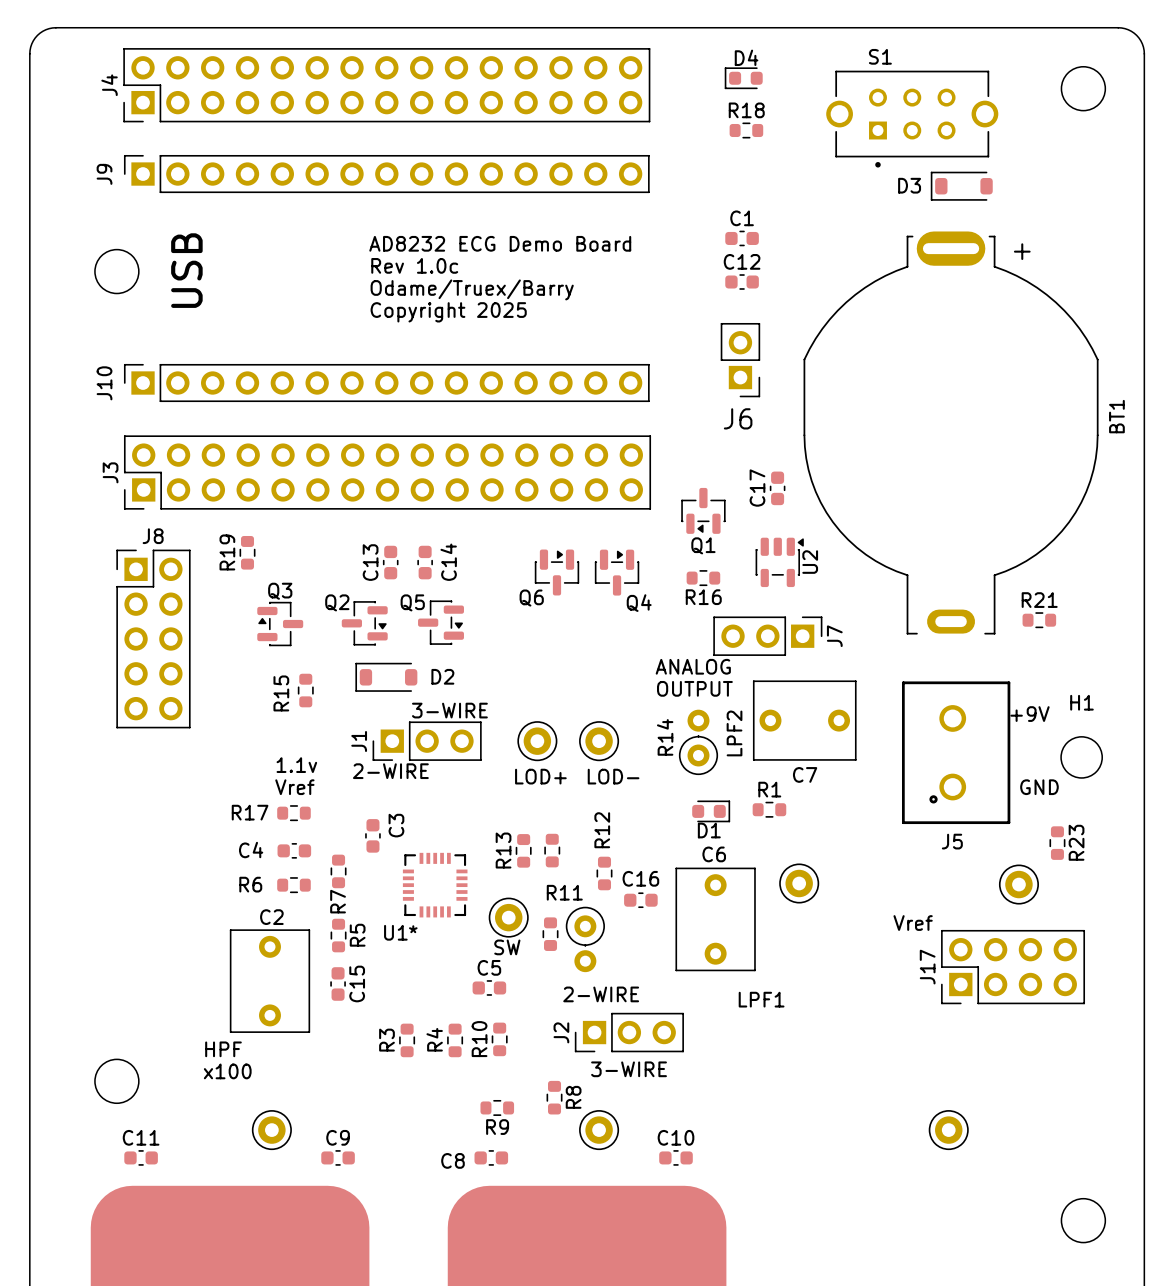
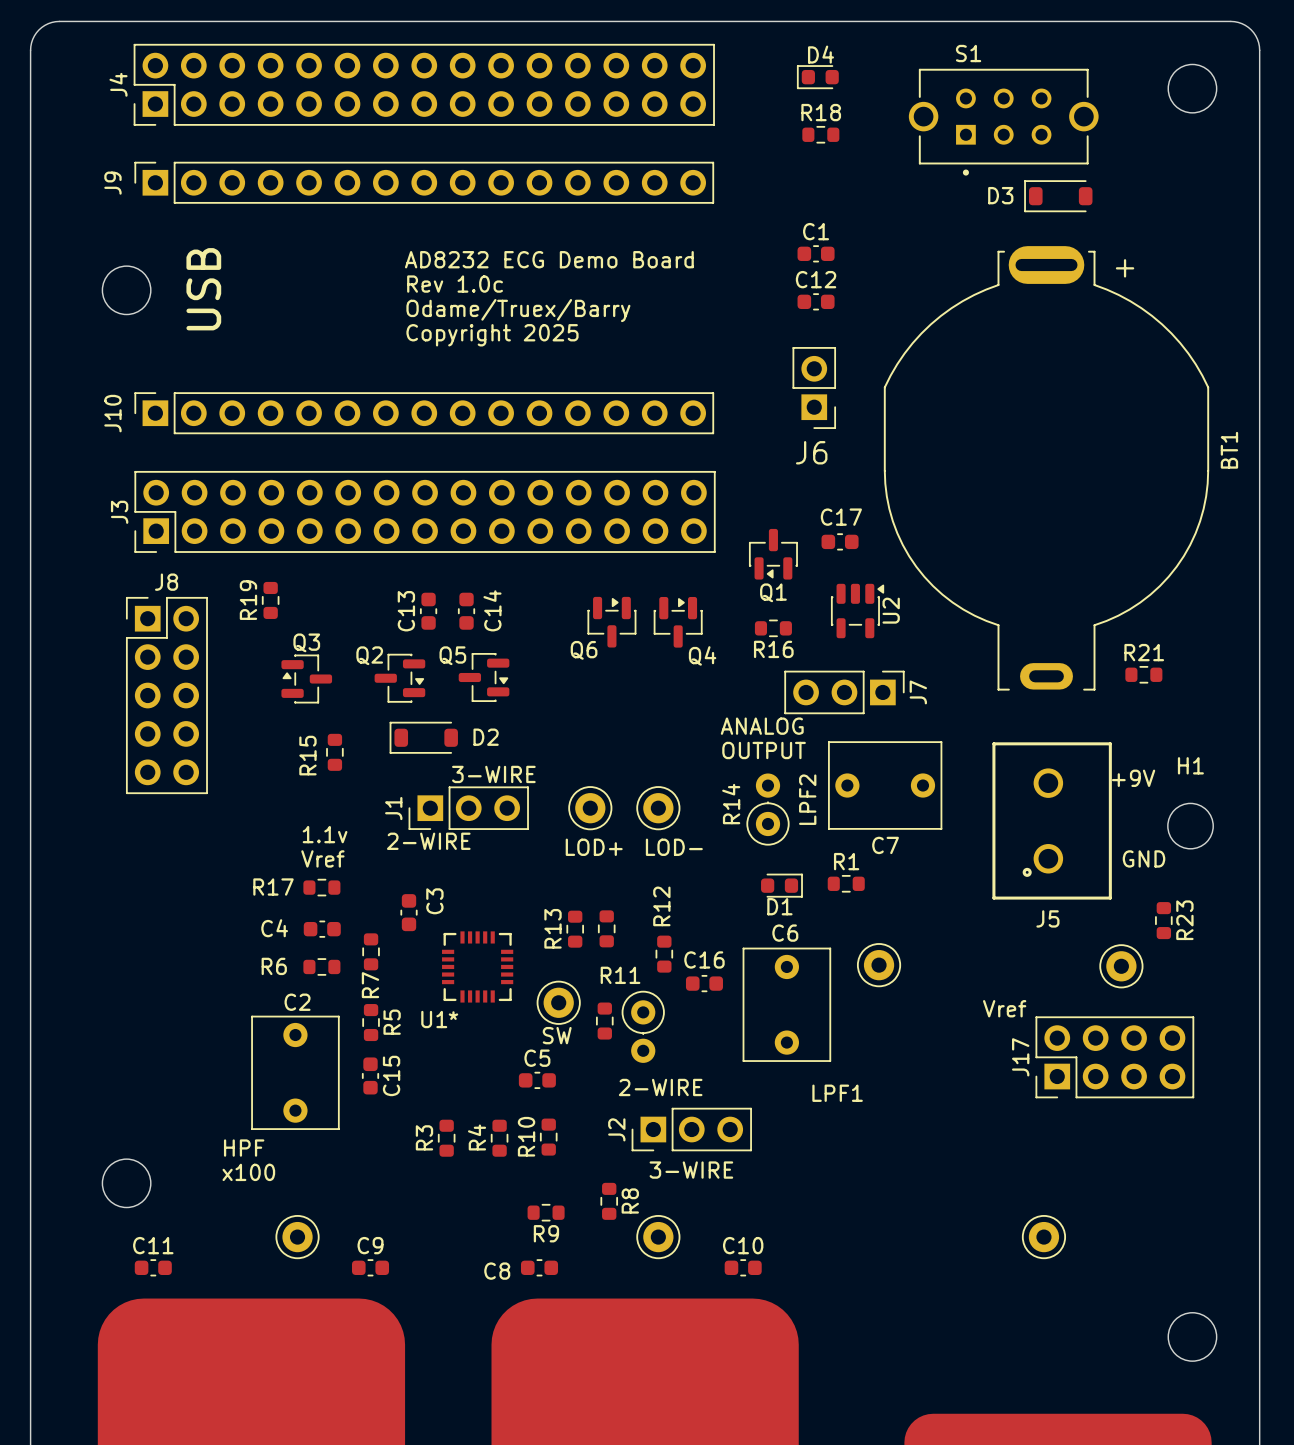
C17 rotation: 0° (777, 488) -> 90° clockwise (840, 541)

